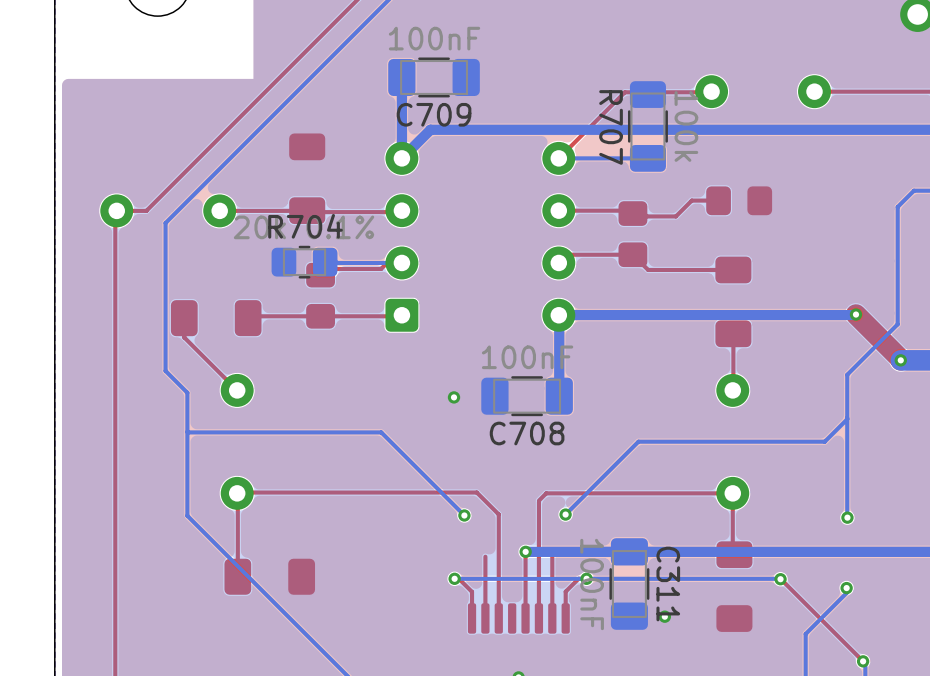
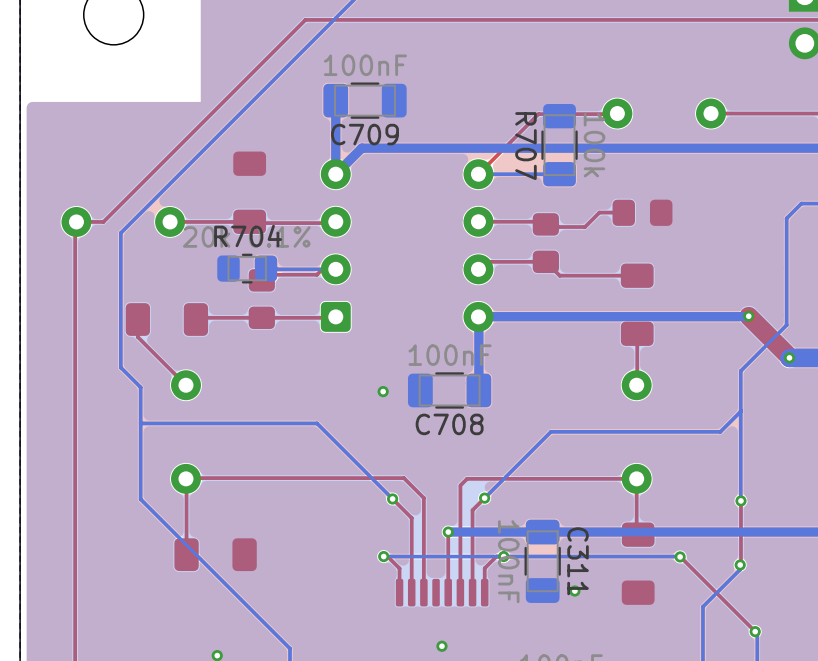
top track: none -> (484, 498) (472, 510) (472, 536)
top track: none -> (392, 498) (411, 518) (411, 536)
top track: none -> (740, 500) (740, 564)

